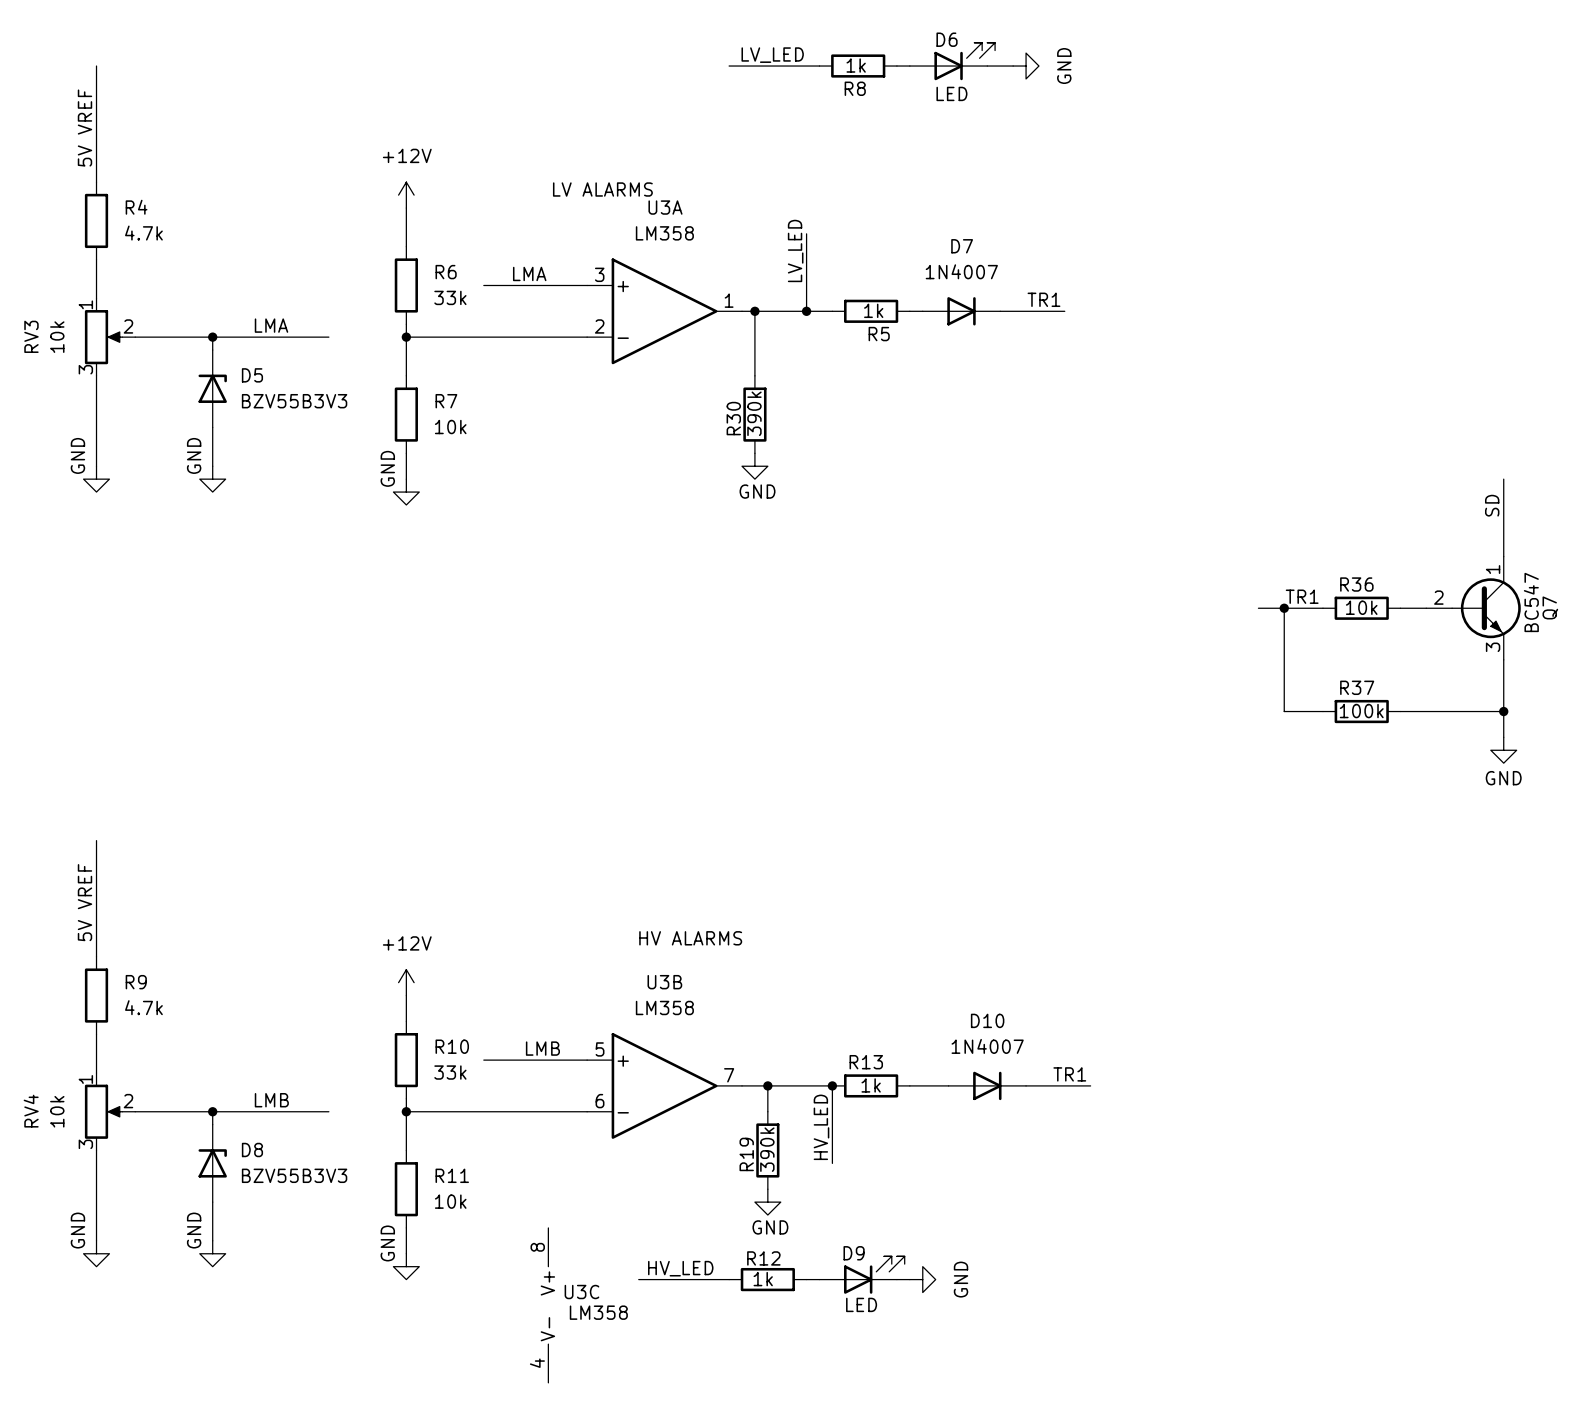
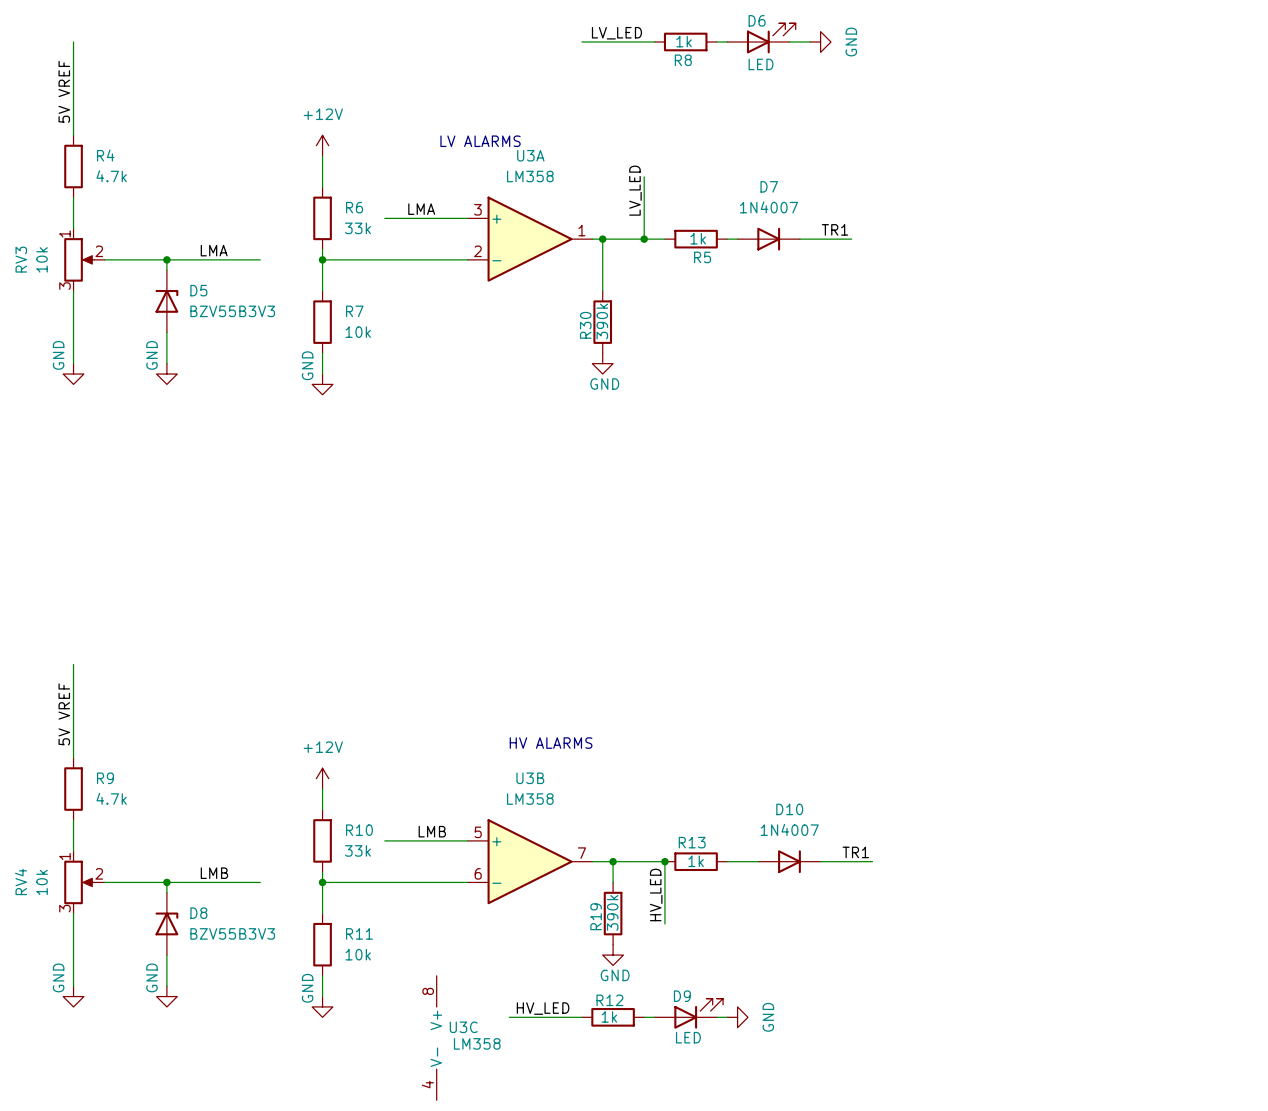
wire: (1503, 479) (1503, 556) -> none
label: SD (1492, 505) -> none
label: TR1 (1302, 596) -> none
wire: (1258, 608) (1322, 608) -> none
wire: (1284, 608) (1284, 711) (1322, 711) -> none
junction: (1284, 608) -> none
R36: 10k (1361, 608) -> none
wire: (1400, 608) (1426, 608) -> none
Q7: BC547 (1473, 608) -> none
wire: (1503, 659) (1503, 737) -> none
R37: 100k (1361, 711) -> none
wire: (1400, 711) (1503, 711) -> none
junction: (1503, 711) -> none
power symbol: GND (1503, 750) -> none

